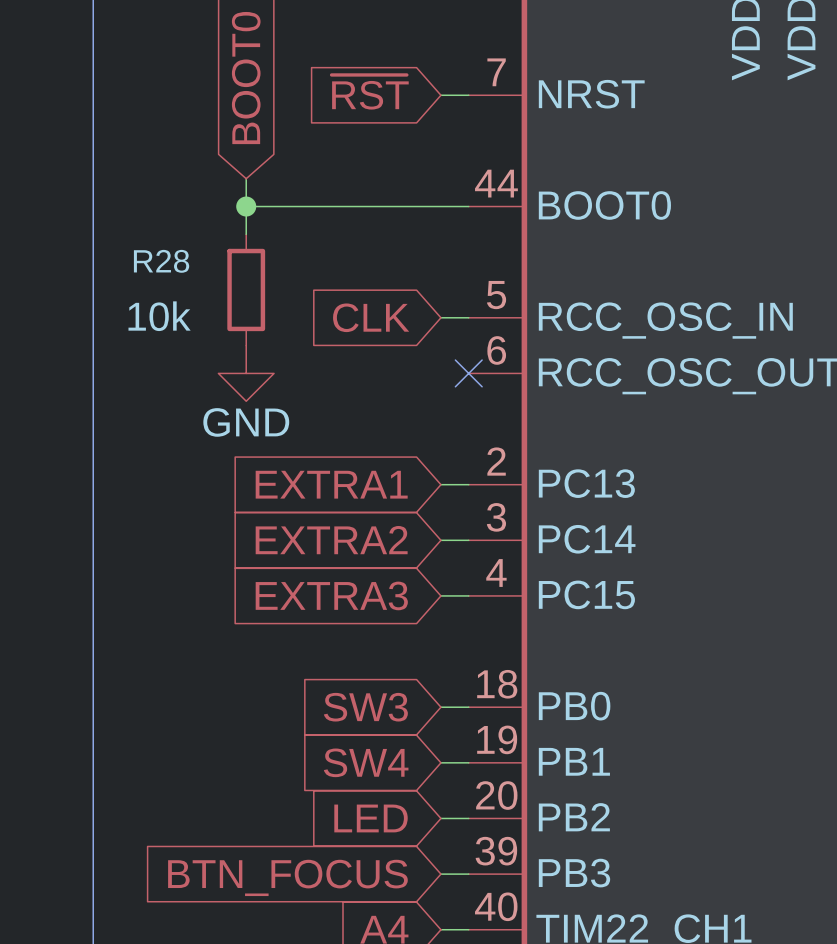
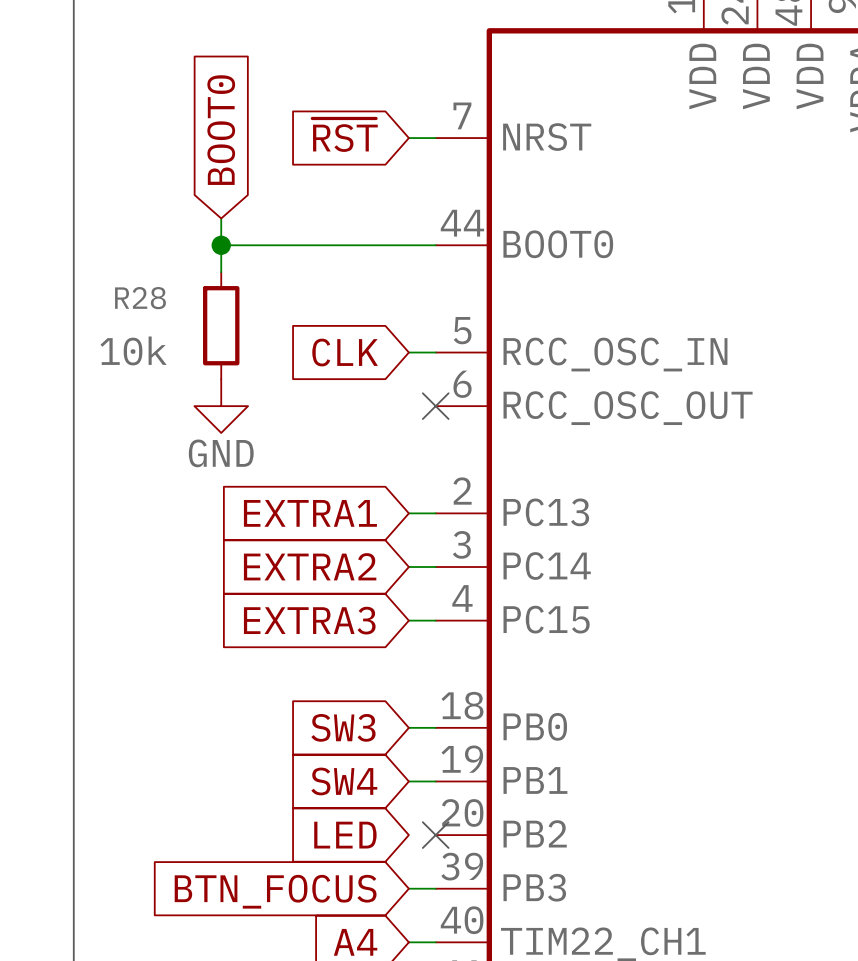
wire: (440, 818) (468, 818) -> none
no-connect mark: none -> (435, 835)

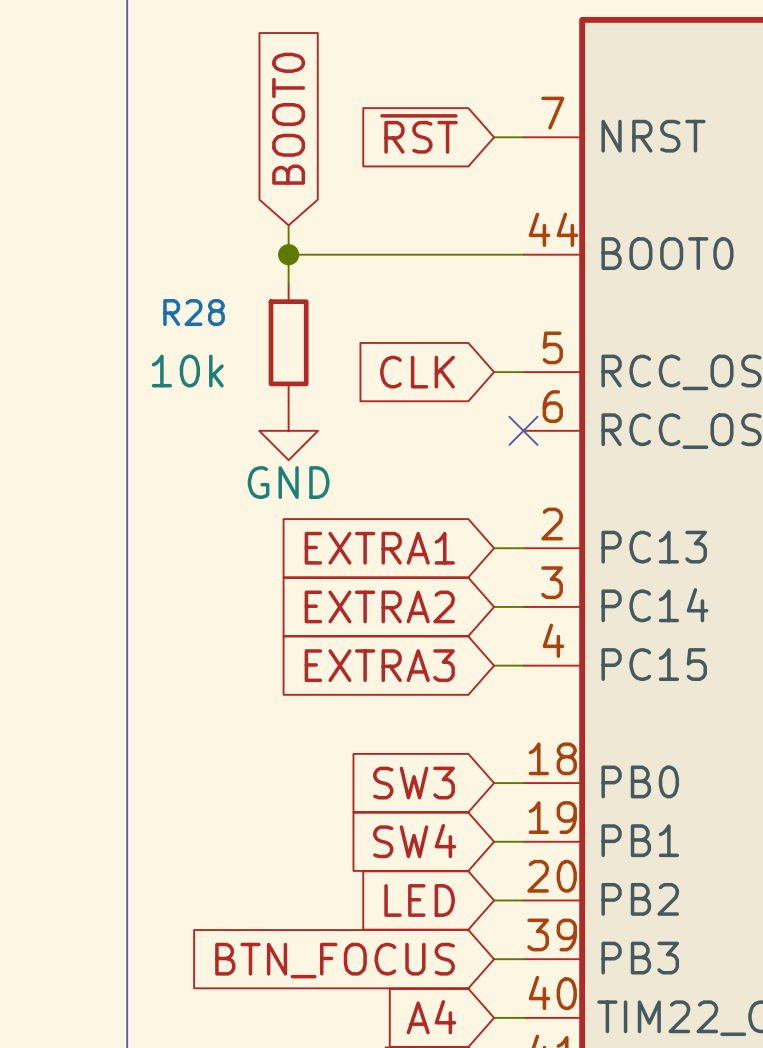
wire: none -> (494, 900) (523, 900)
no-connect mark: (435, 835) -> none

